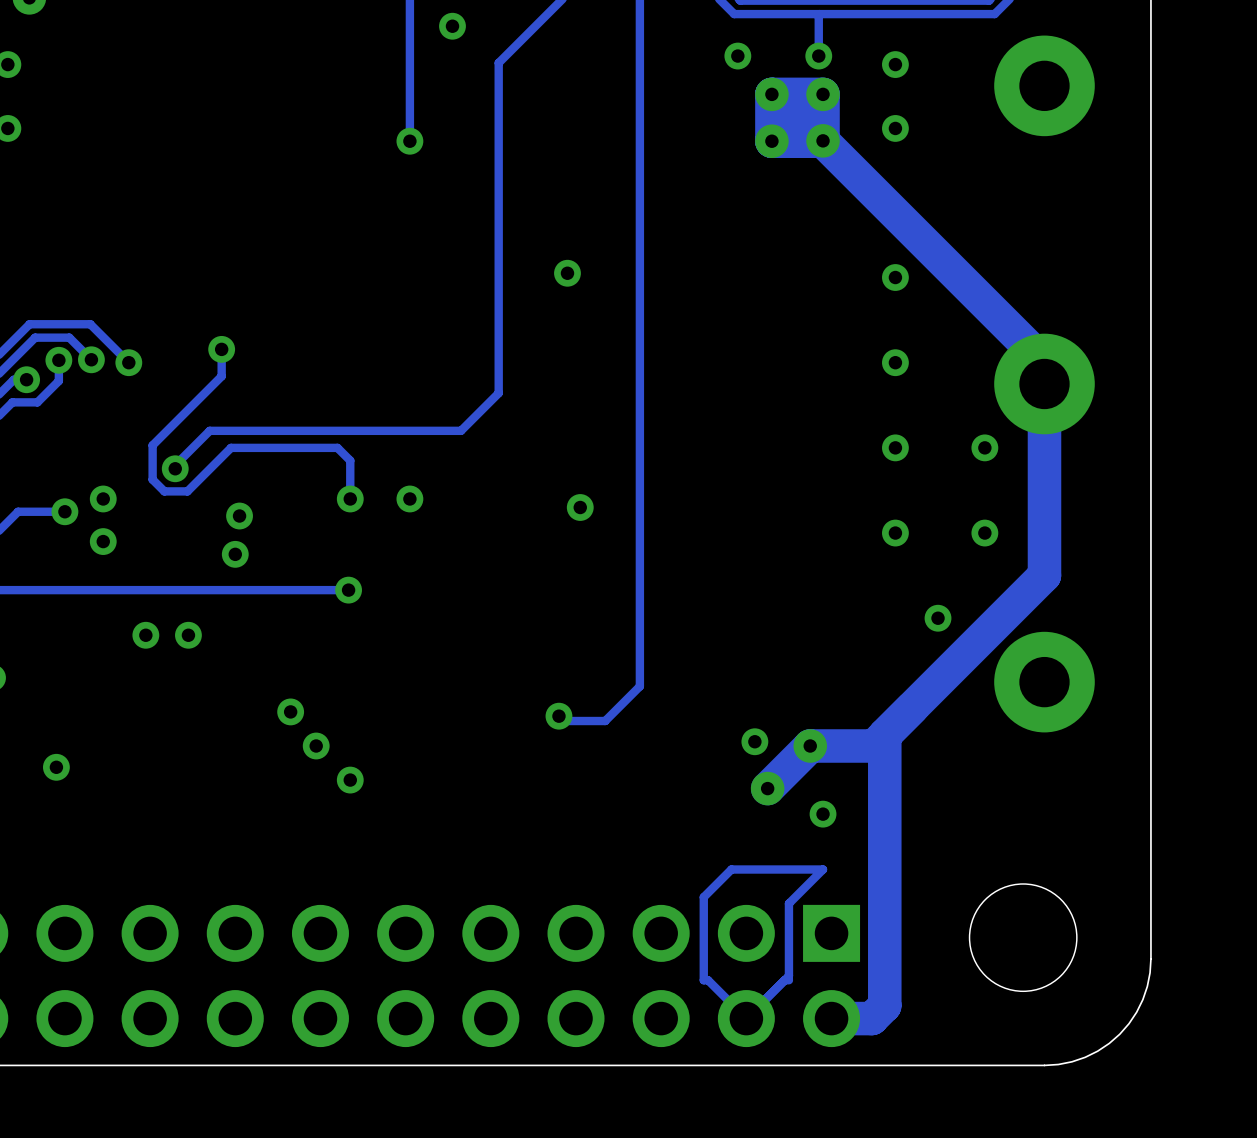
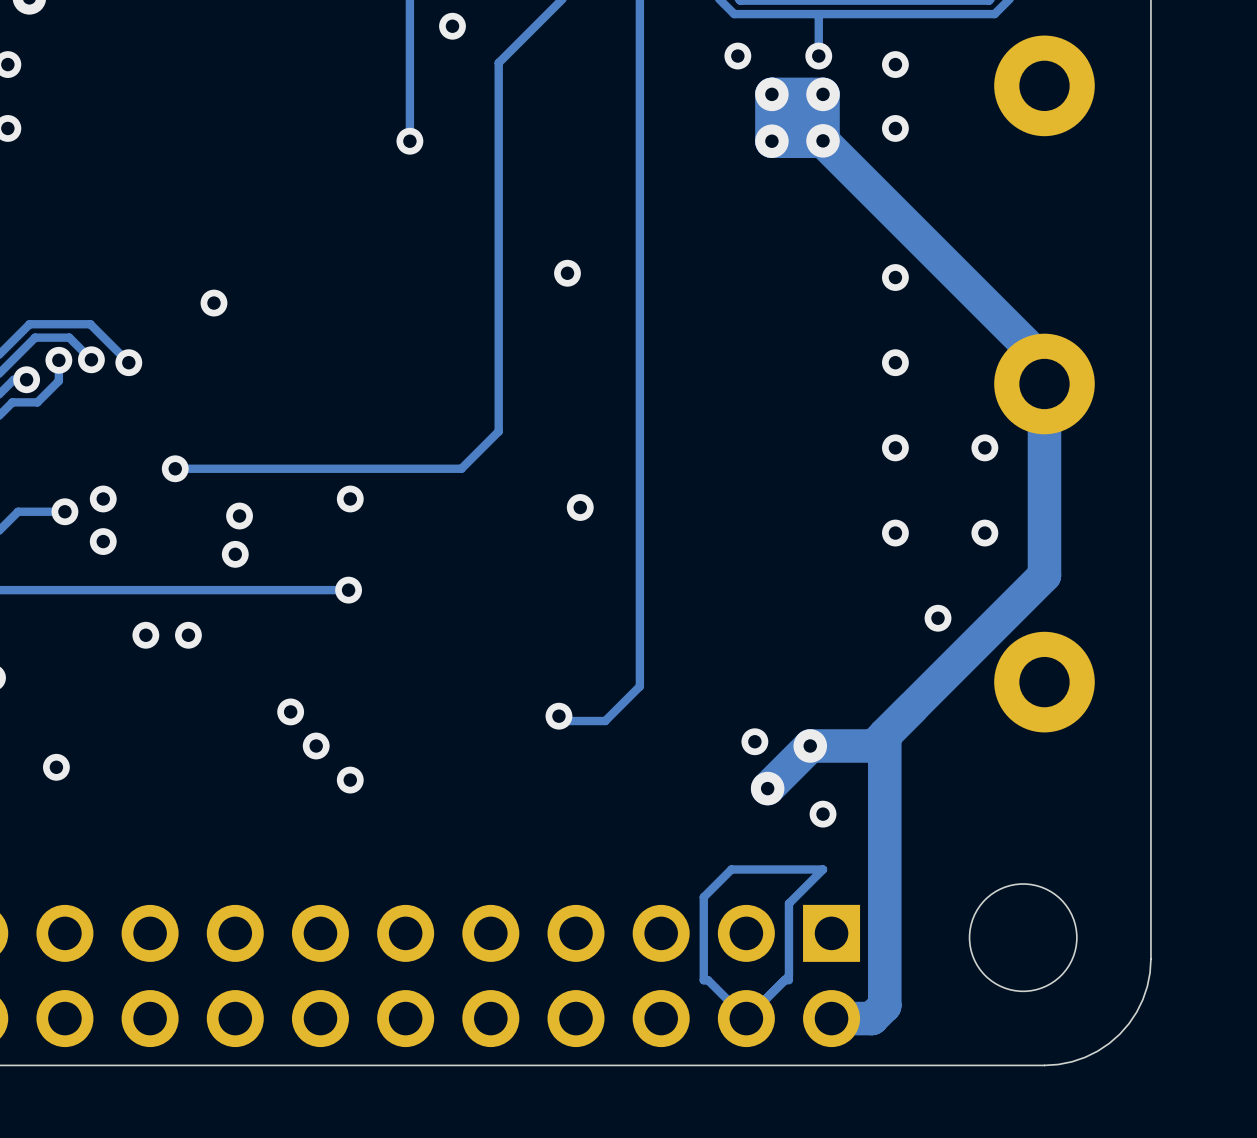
track: (221, 349) (221, 376) (152, 445) (152, 479) (164, 491) (187, 491) (231, 447) (337, 447) (350, 460) (350, 498) -> none
via position: (221, 349) -> (213, 303)
track: (498, 393) (461, 430) (209, 430) (175, 465) (175, 468) -> (498, 393) (498, 431) (461, 468) (175, 468)
via: (409, 498) -> none

